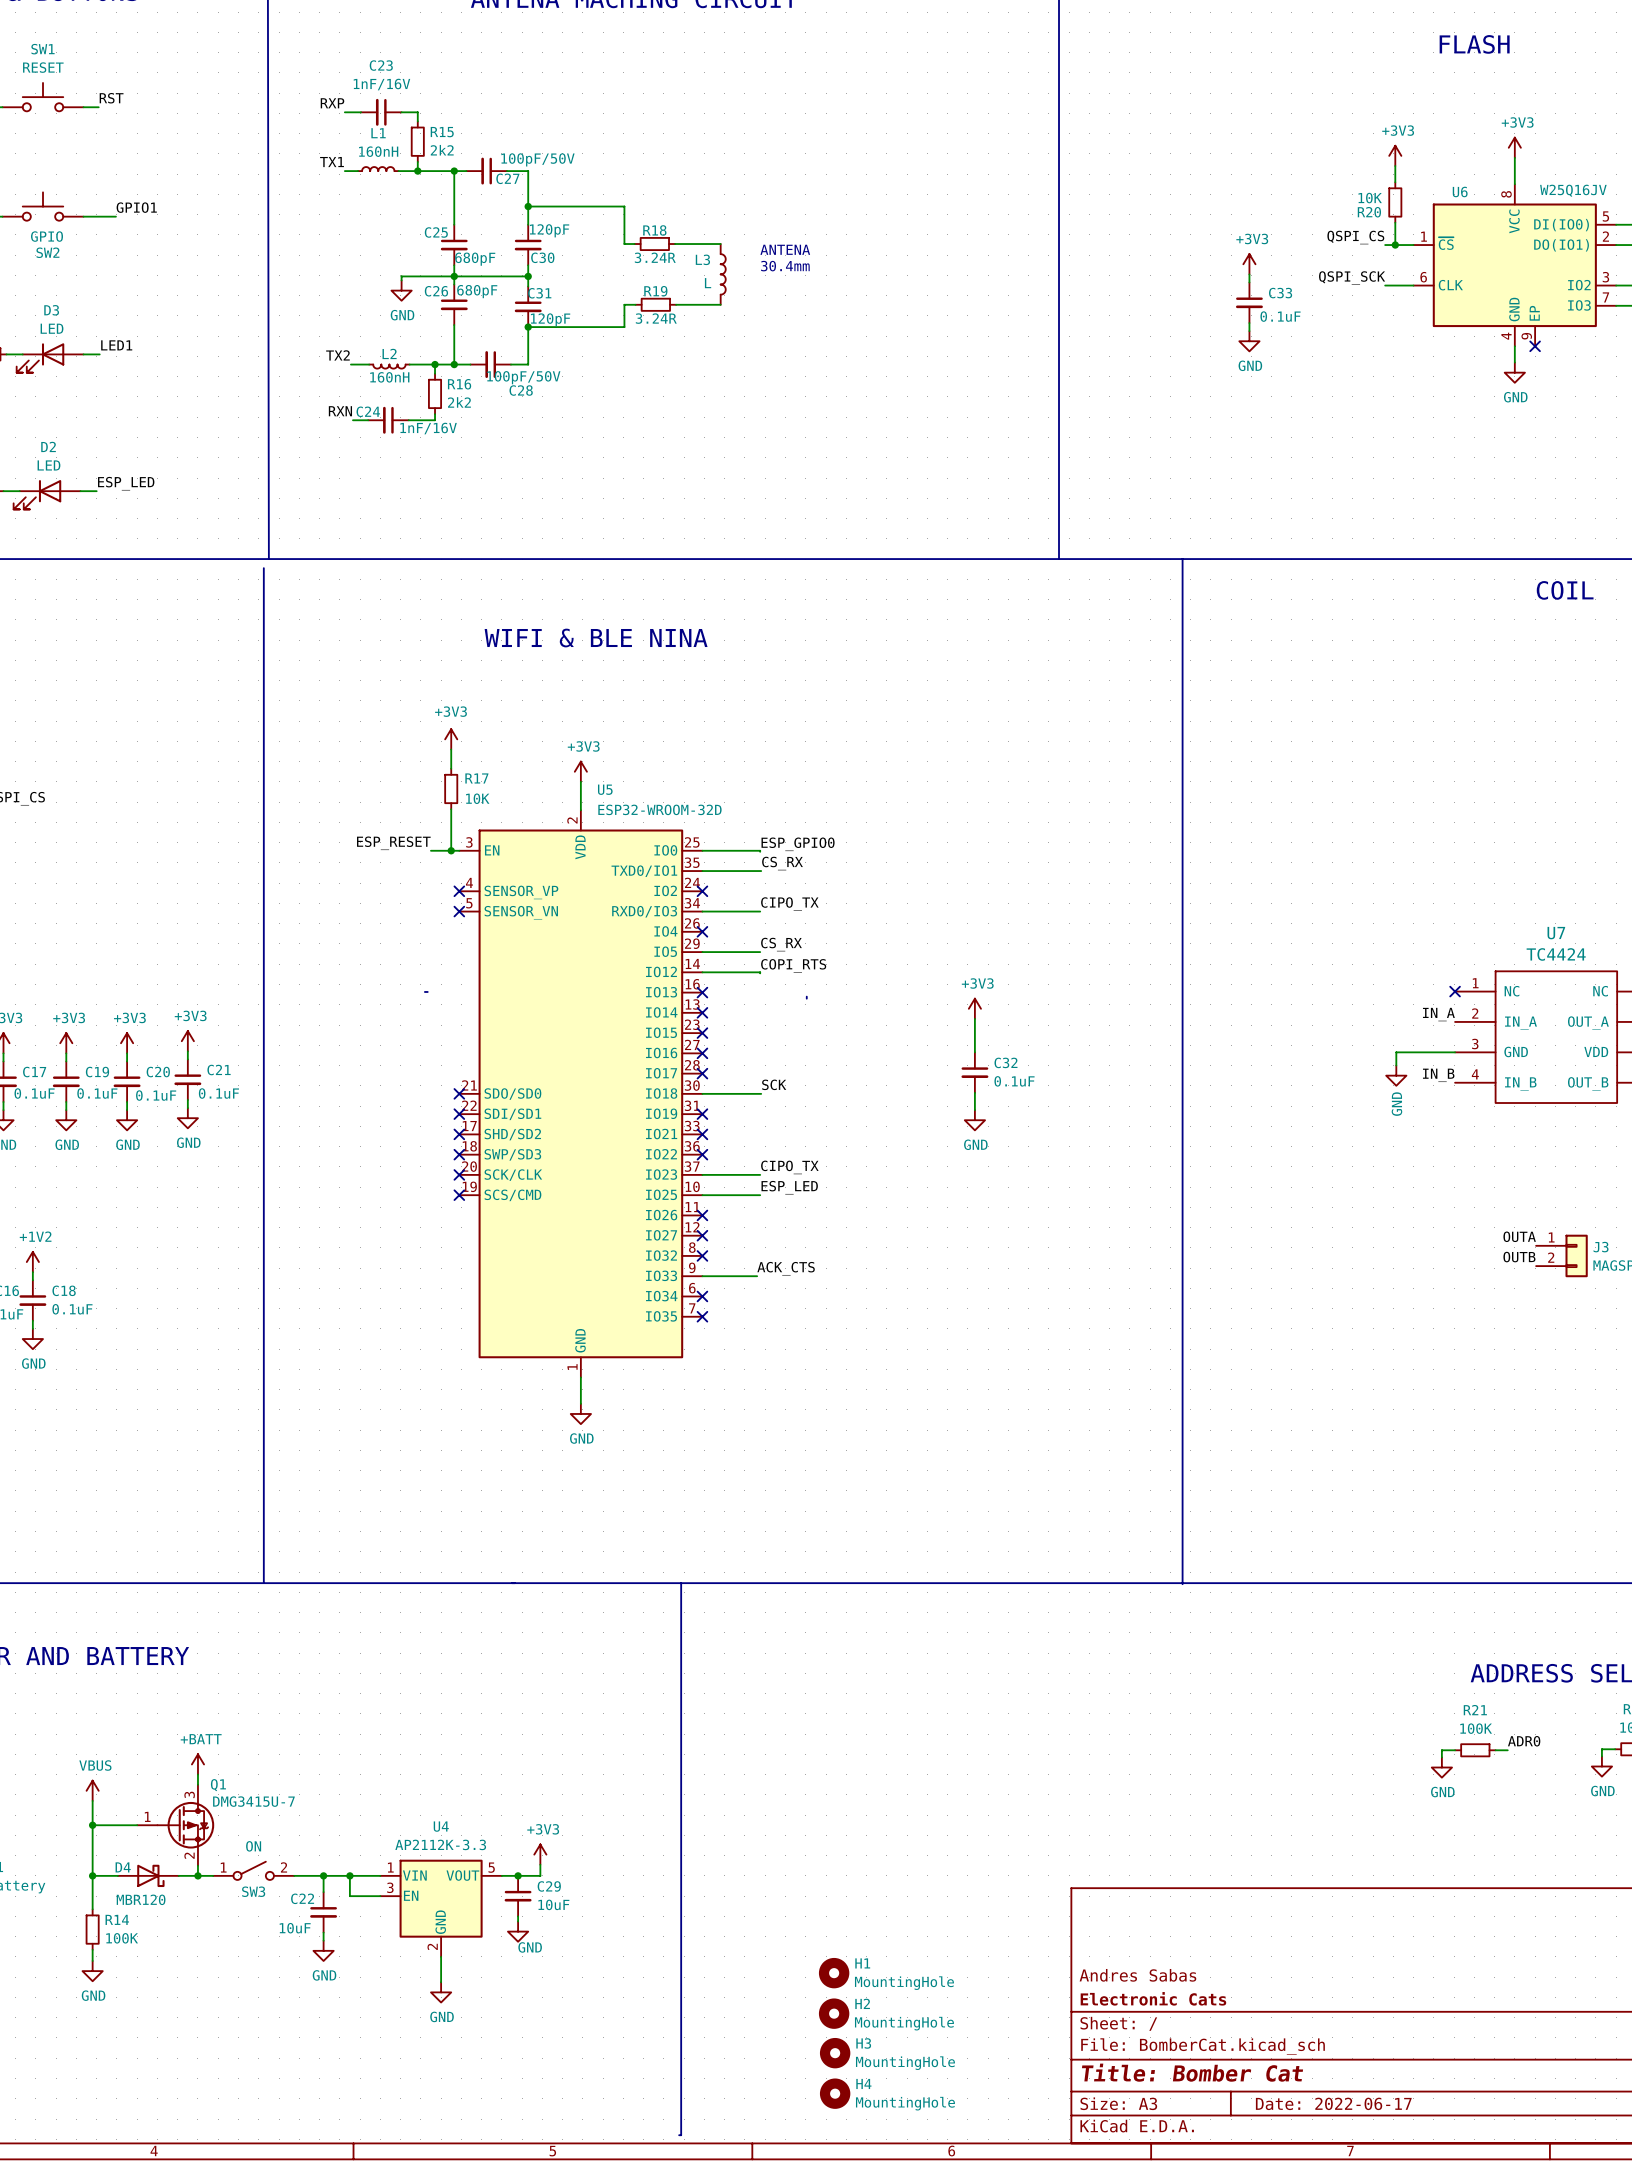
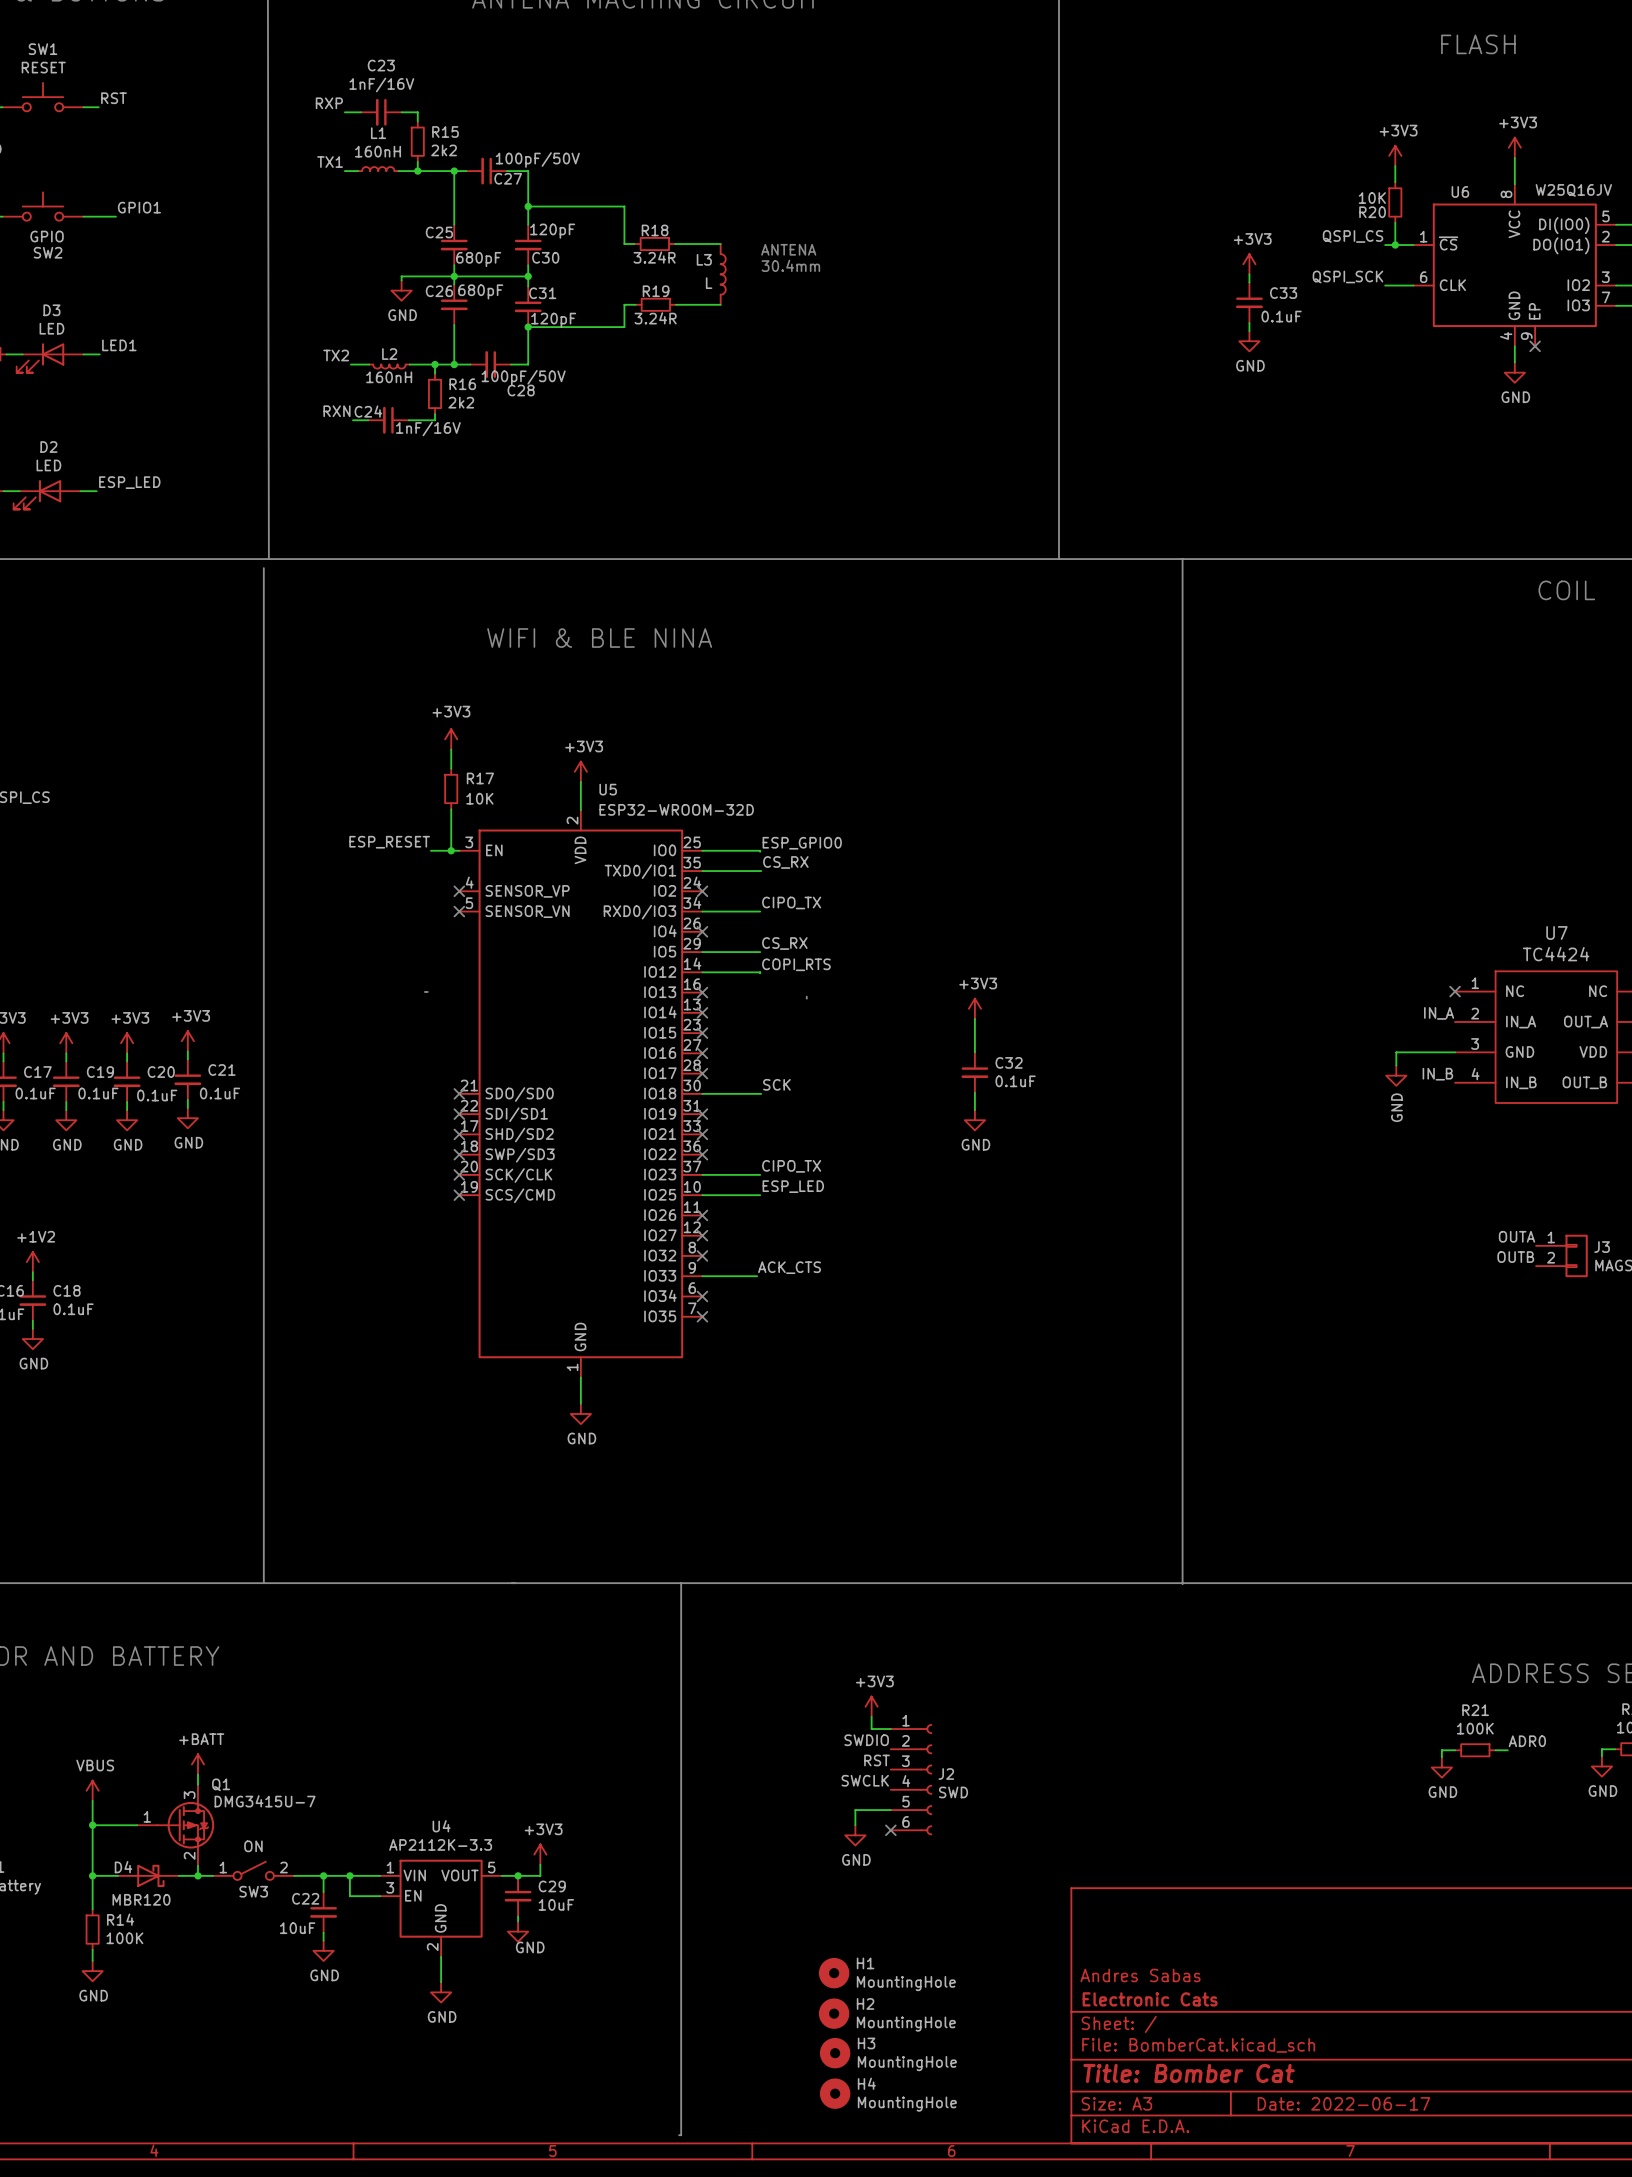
power symbol: none -> +3V3 (871, 1706)
wire: none -> (871, 1716) (871, 1729) (890, 1729)
label: none -> SWDIO (866, 1740)
label: none -> RST (877, 1760)
J2: none -> SWD (911, 1779)
label: none -> SWCLK (865, 1780)
wire: none -> (890, 1810) (855, 1810) (855, 1825)
no-connect mark: none -> (890, 1830)
power symbol: none -> GND (855, 1835)

